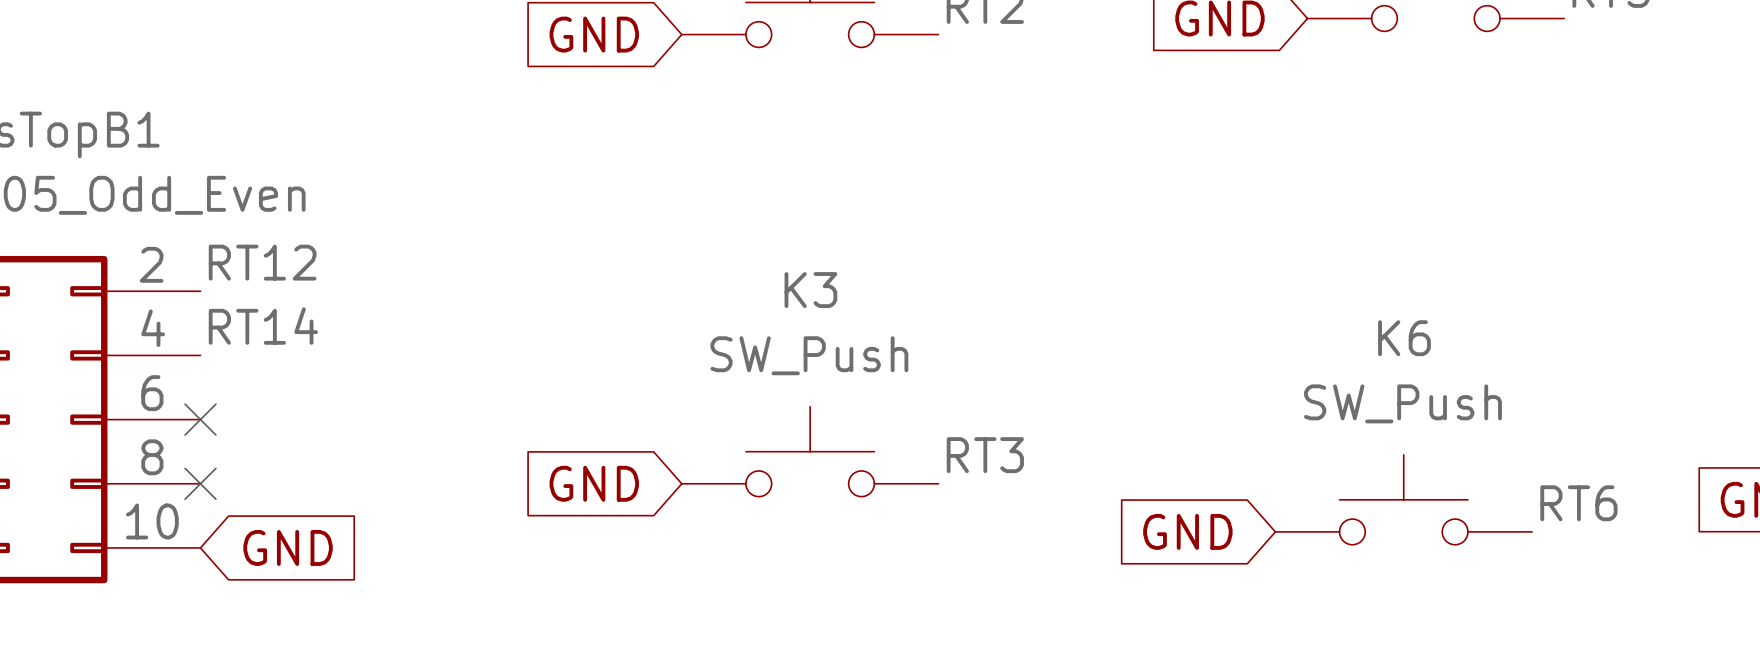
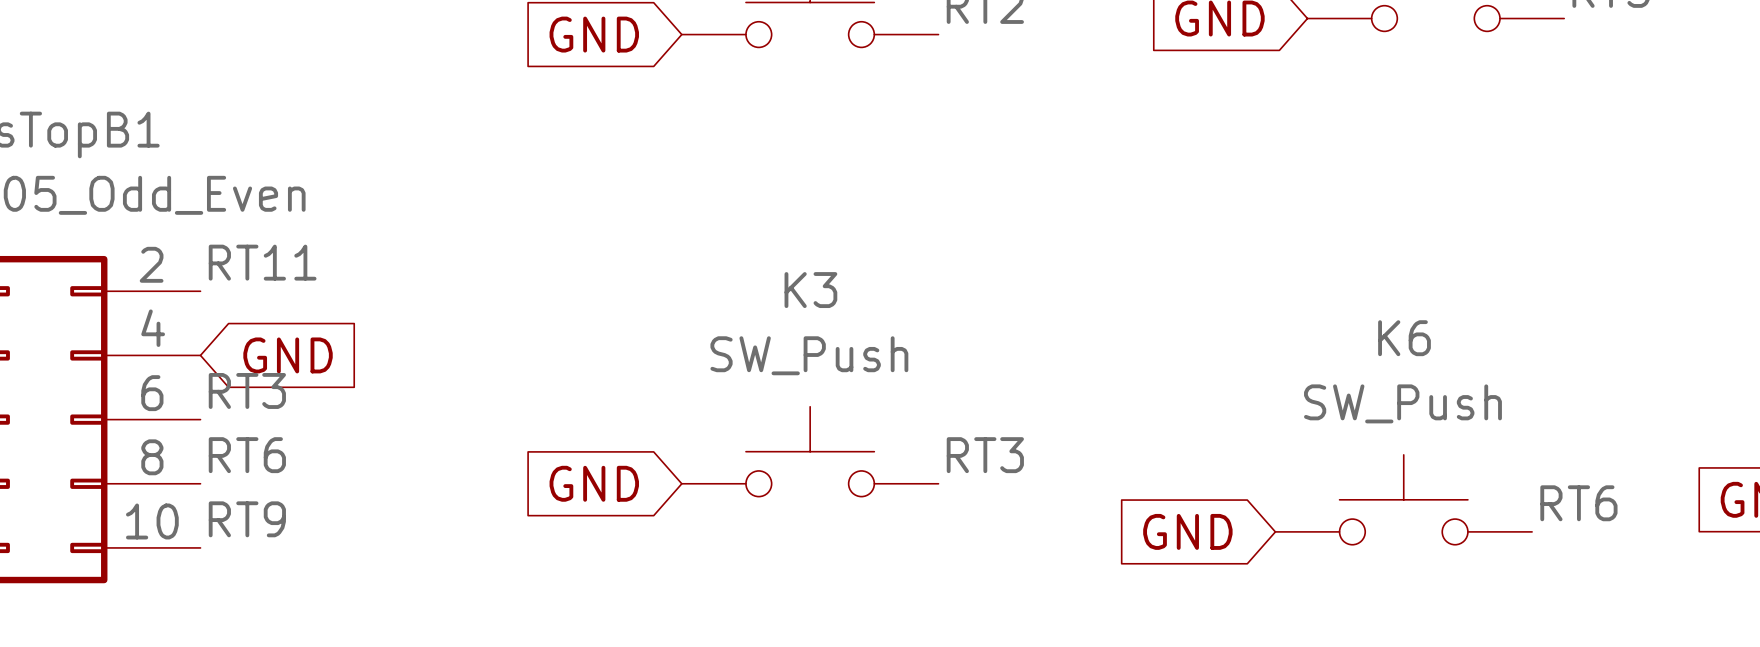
label: RT12 (262, 262) -> RT11 (262, 262)
label: RT14 (263, 326) -> none
label: none -> RT3 (247, 390)
no-connect mark: (200, 419) -> none
label: none -> RT6 (247, 455)
no-connect mark: (200, 483) -> none
label: none -> RT9 (247, 519)
global label position: GND (288, 547) -> GND (288, 355)

